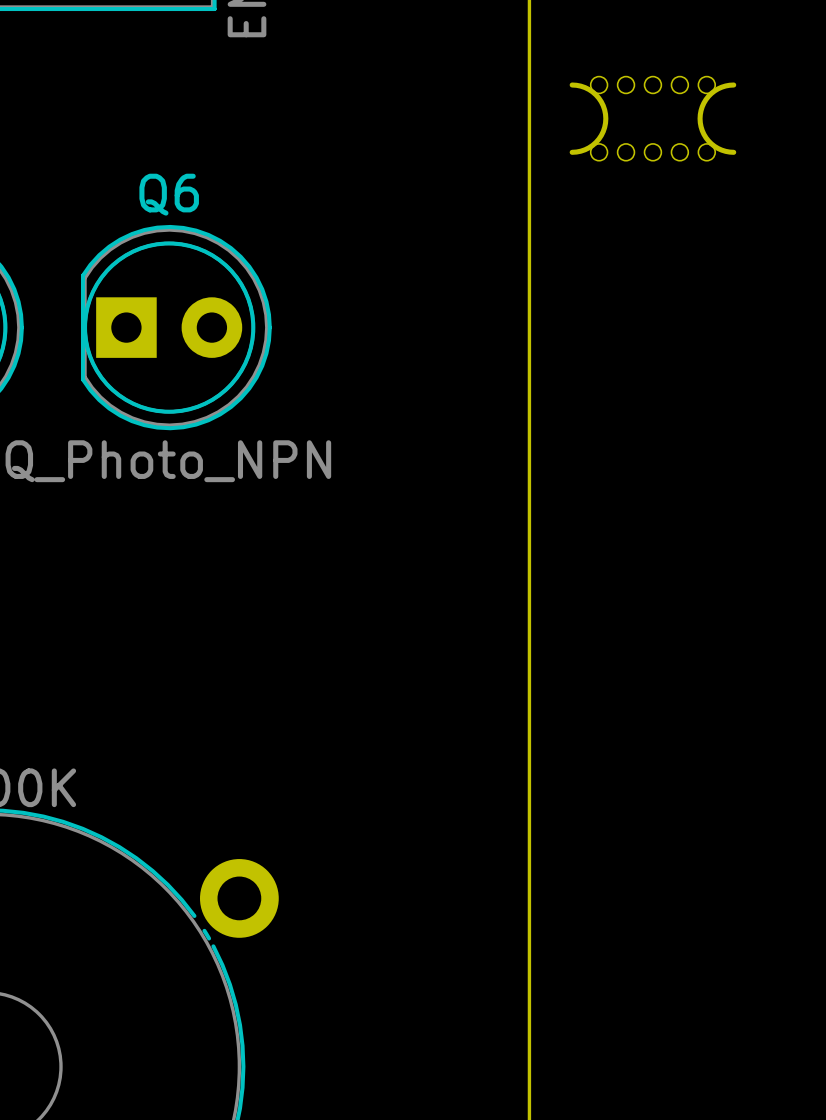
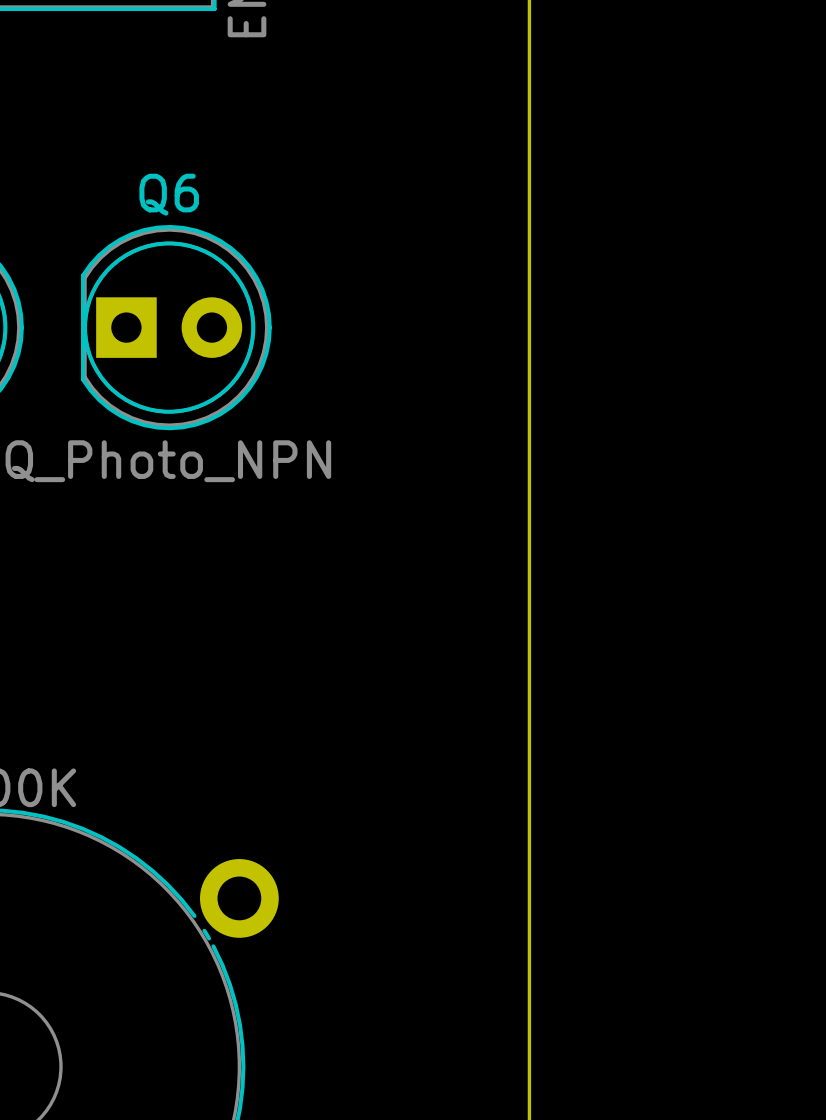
round board edge: [590, 76, 608, 94] -> none
round board edge: [617, 76, 635, 94] -> none
round board edge: [644, 76, 662, 94] -> none
round board edge: [671, 76, 689, 94] -> none
round board edge: [698, 76, 716, 94] -> none
board edge: (572, 85) (585, 87) (595, 94) (603, 105) (605, 118) (603, 131) (595, 142) (585, 149) (572, 152) -> none
board edge: (733, 85) (721, 87) (711, 93) (702, 106) (700, 118) (702, 130) (711, 143) (721, 150) (733, 152) -> none
round board edge: [590, 143, 608, 161] -> none
round board edge: [617, 143, 635, 161] -> none
round board edge: [644, 143, 662, 161] -> none
round board edge: [671, 143, 689, 161] -> none
round board edge: [698, 143, 716, 161] -> none

